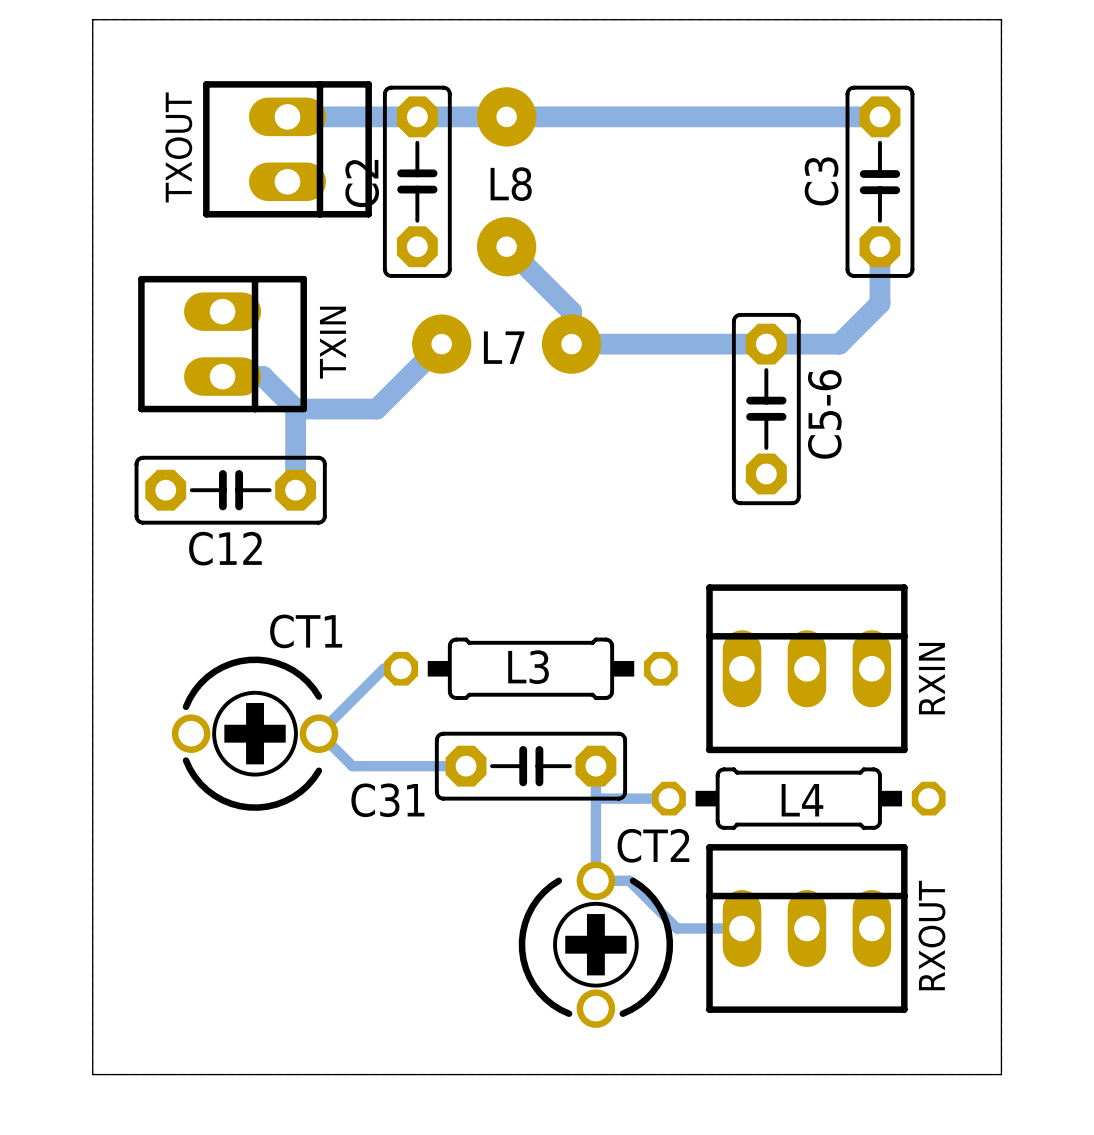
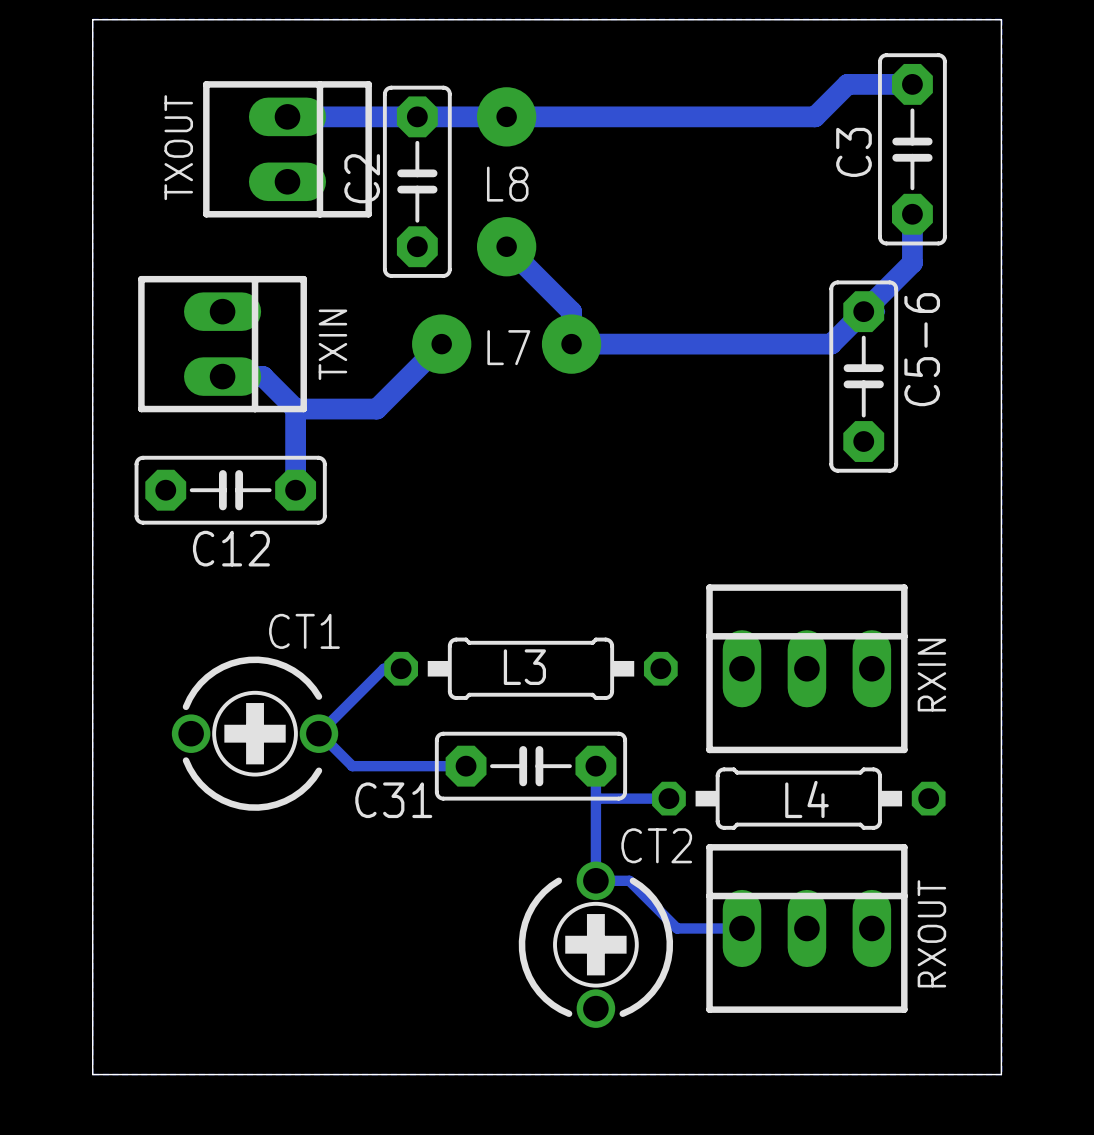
bottom track: (815, 116) (879, 116) -> (815, 116) (847, 84) (912, 84)
C3 position: (879, 181) -> (912, 149)
bottom track: (879, 246) (879, 303) (839, 344) (831, 344) -> (912, 214) (912, 262) (831, 344)
C5-6 position: (766, 409) -> (863, 376)
C5-6 name position: C5-6 (824, 414) -> C5-6 (922, 349)

